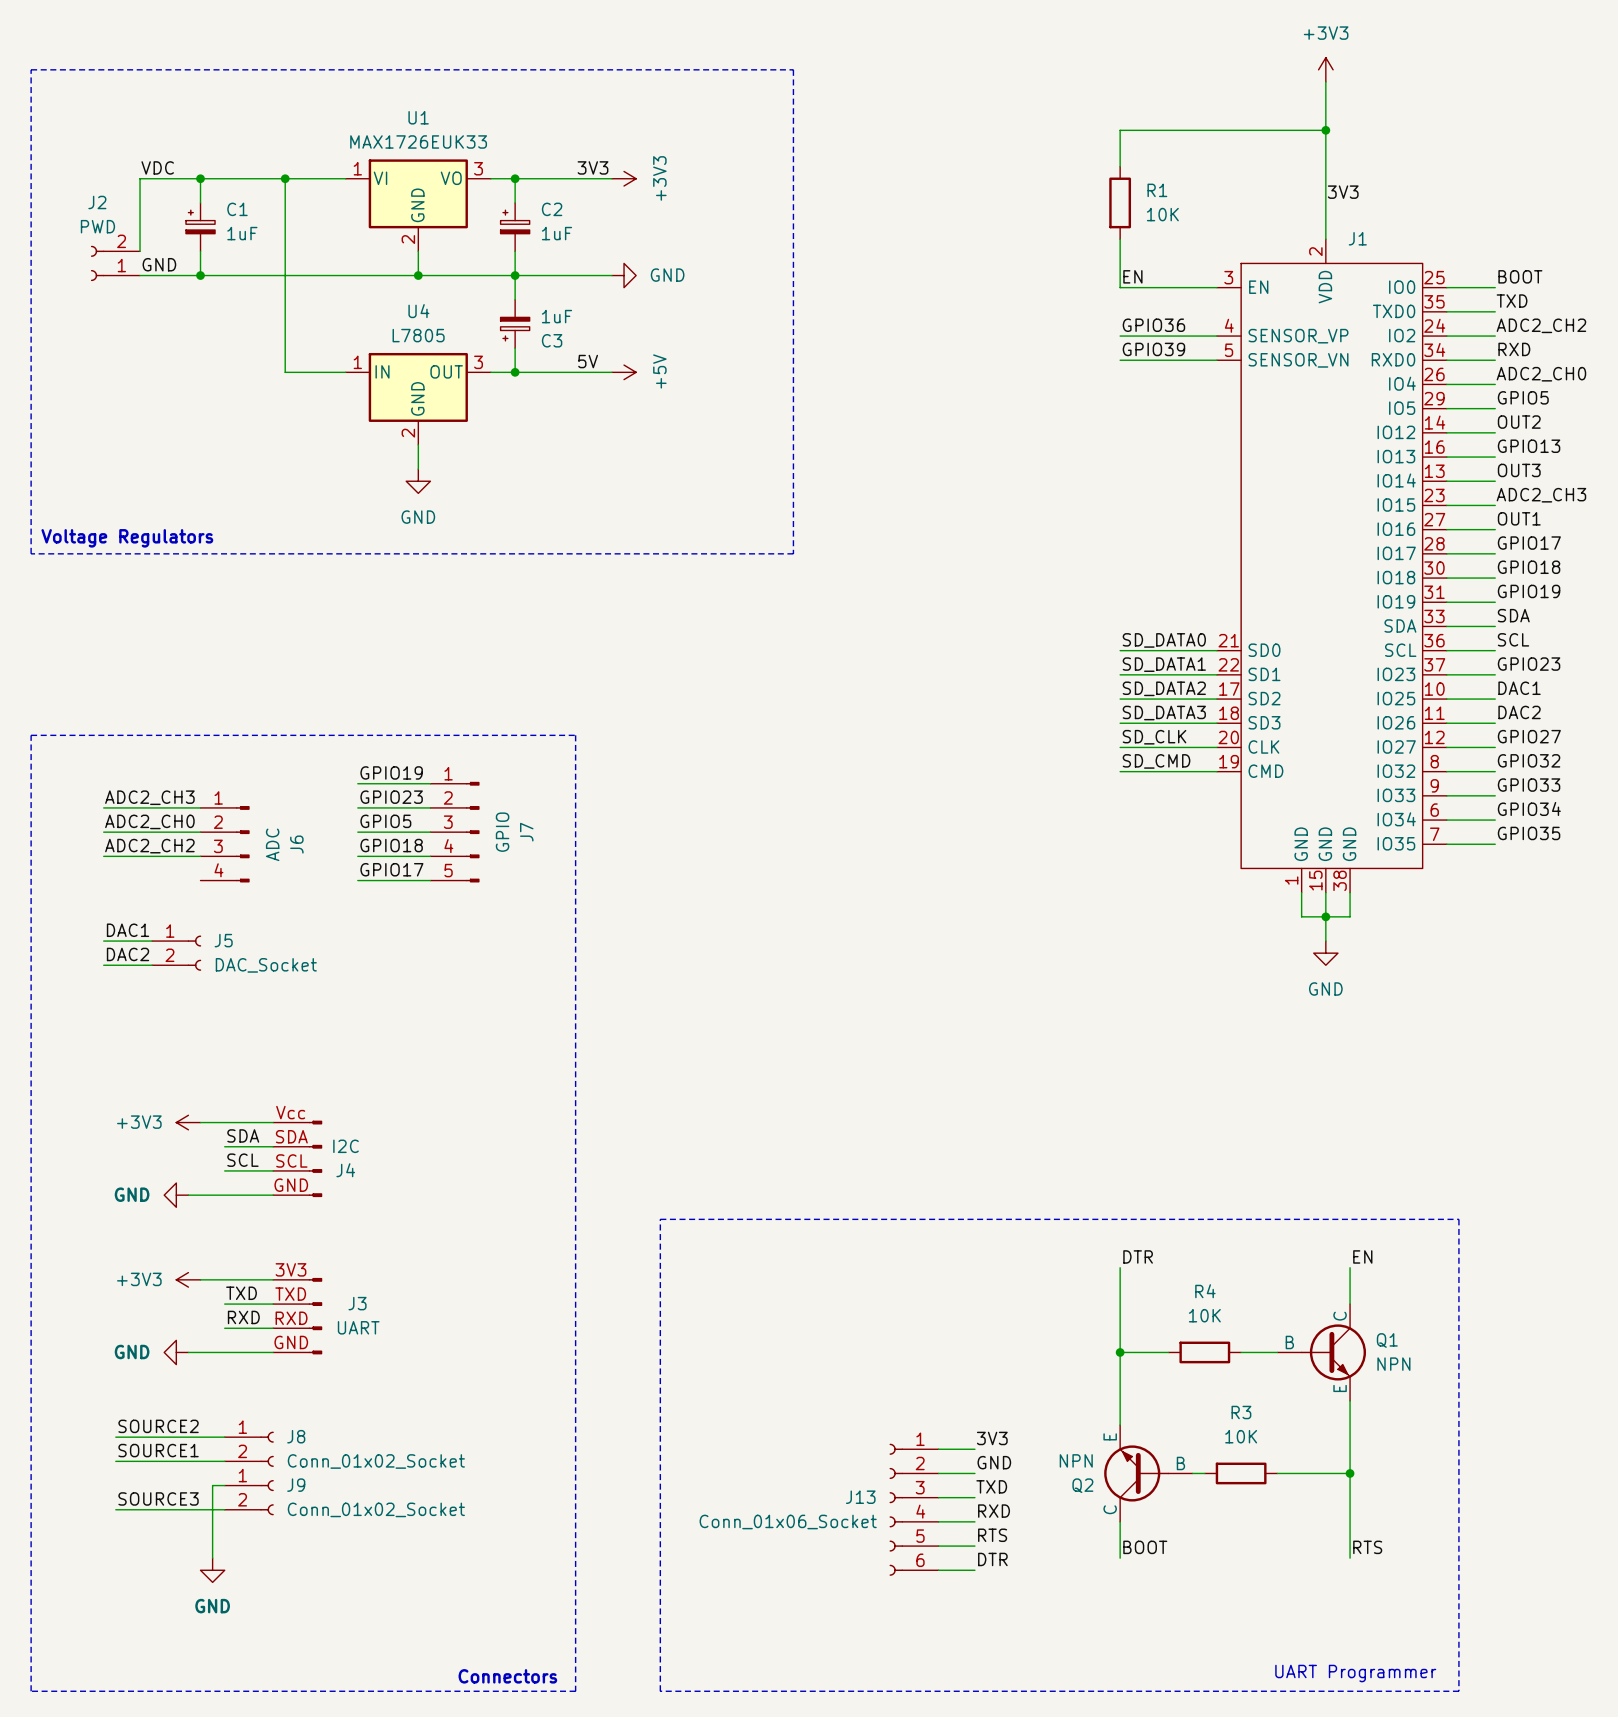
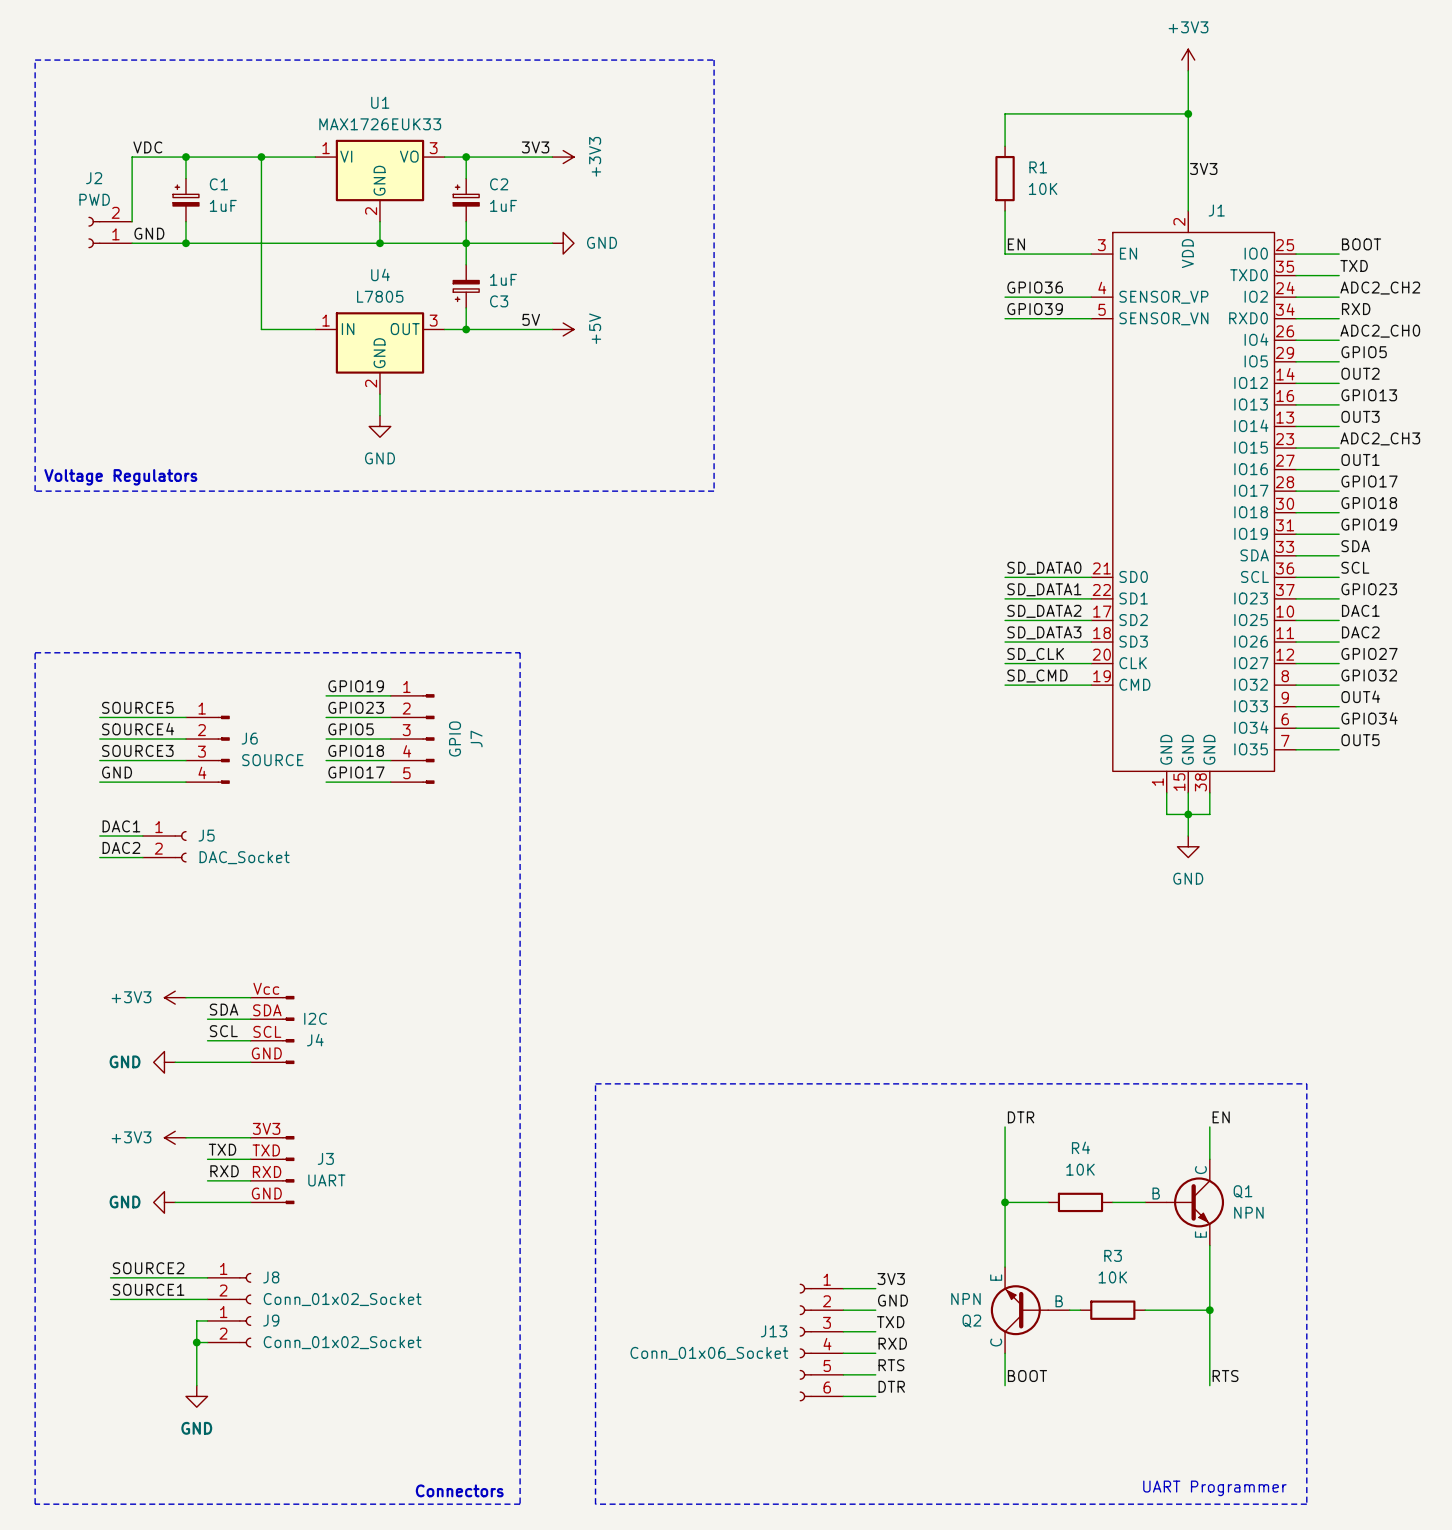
label: GPIO33 (1529, 785) -> OUT4 (1360, 696)
label: ADC2_CH3 (149, 797) -> SOURCE5 (137, 707)
label: ADC2_CH0 (149, 821) -> SOURCE4 (138, 729)
label: GPIO35 (1529, 833) -> OUT5 (1360, 740)
J6 value: ADC (272, 844) -> SOURCE (272, 760)
J6 name rotation: 0° (296, 844) -> 90° clockwise (249, 738)
label: ADC2_CH2 (149, 846) -> SOURCE3 (137, 750)
label: none -> GND (117, 772)
wire: none -> (99, 782) (185, 782)
label: SOURCE3 (158, 1498) -> none
wire: (115, 1509) (212, 1509) -> none
junction: none -> (196, 1342)

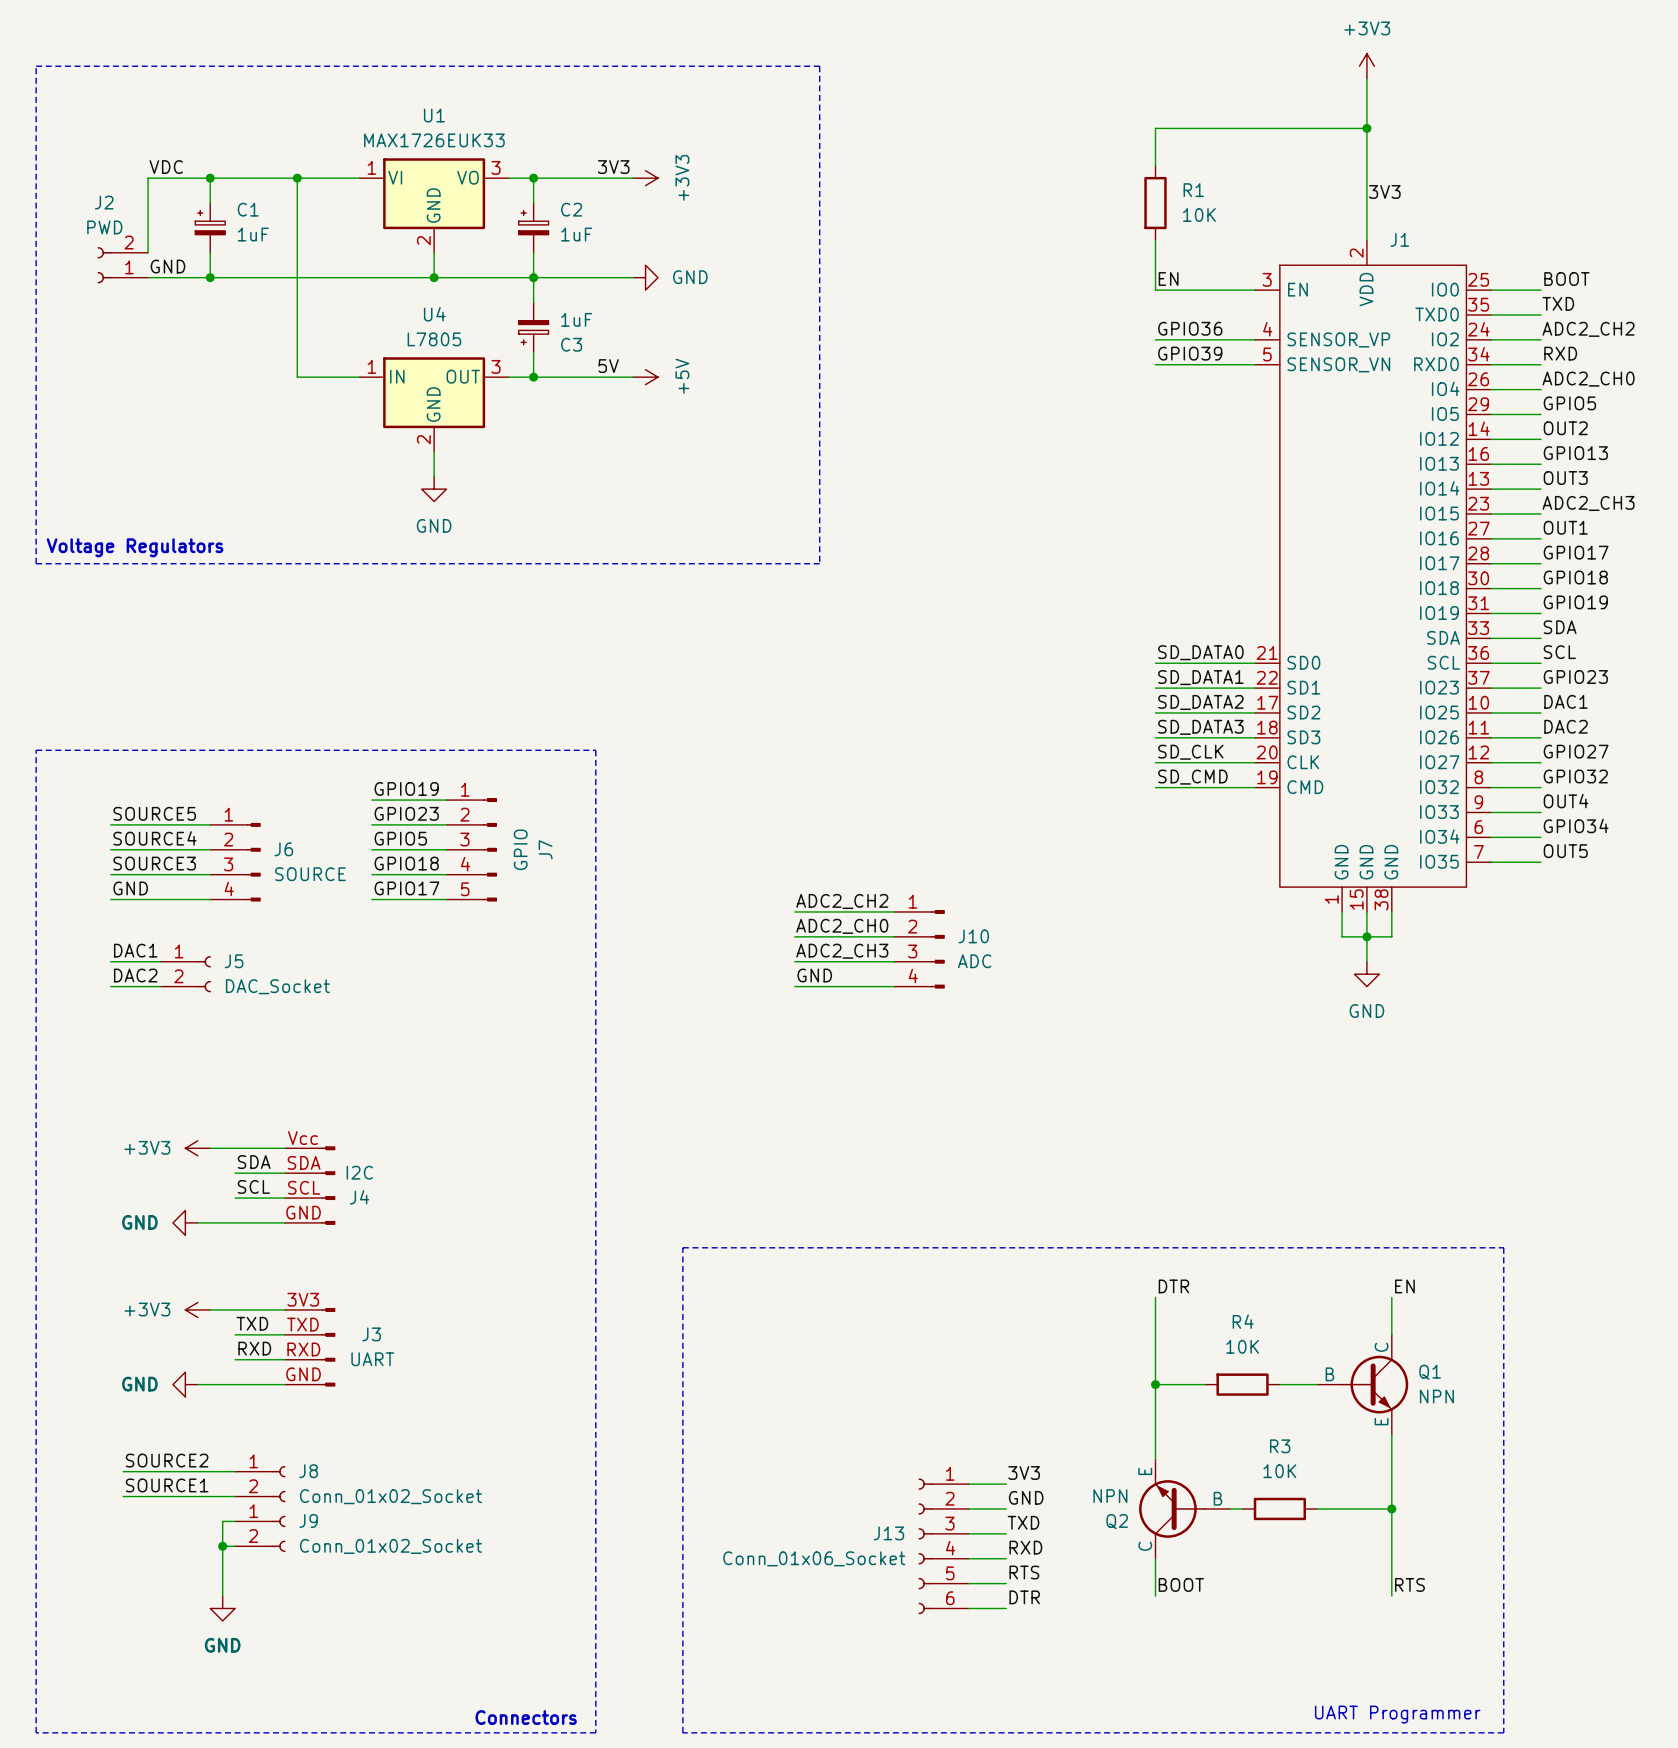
label: none -> ADC2_CH2 (842, 901)
wire: none -> (794, 911) (894, 911)
label: none -> ADC2_CH0 (842, 926)
wire: none -> (794, 936) (894, 936)
J10: none -> ADC (919, 949)
label: none -> ADC2_CH3 (842, 951)
wire: none -> (794, 961) (894, 961)
label: none -> GND (814, 975)
wire: none -> (794, 986) (894, 986)

